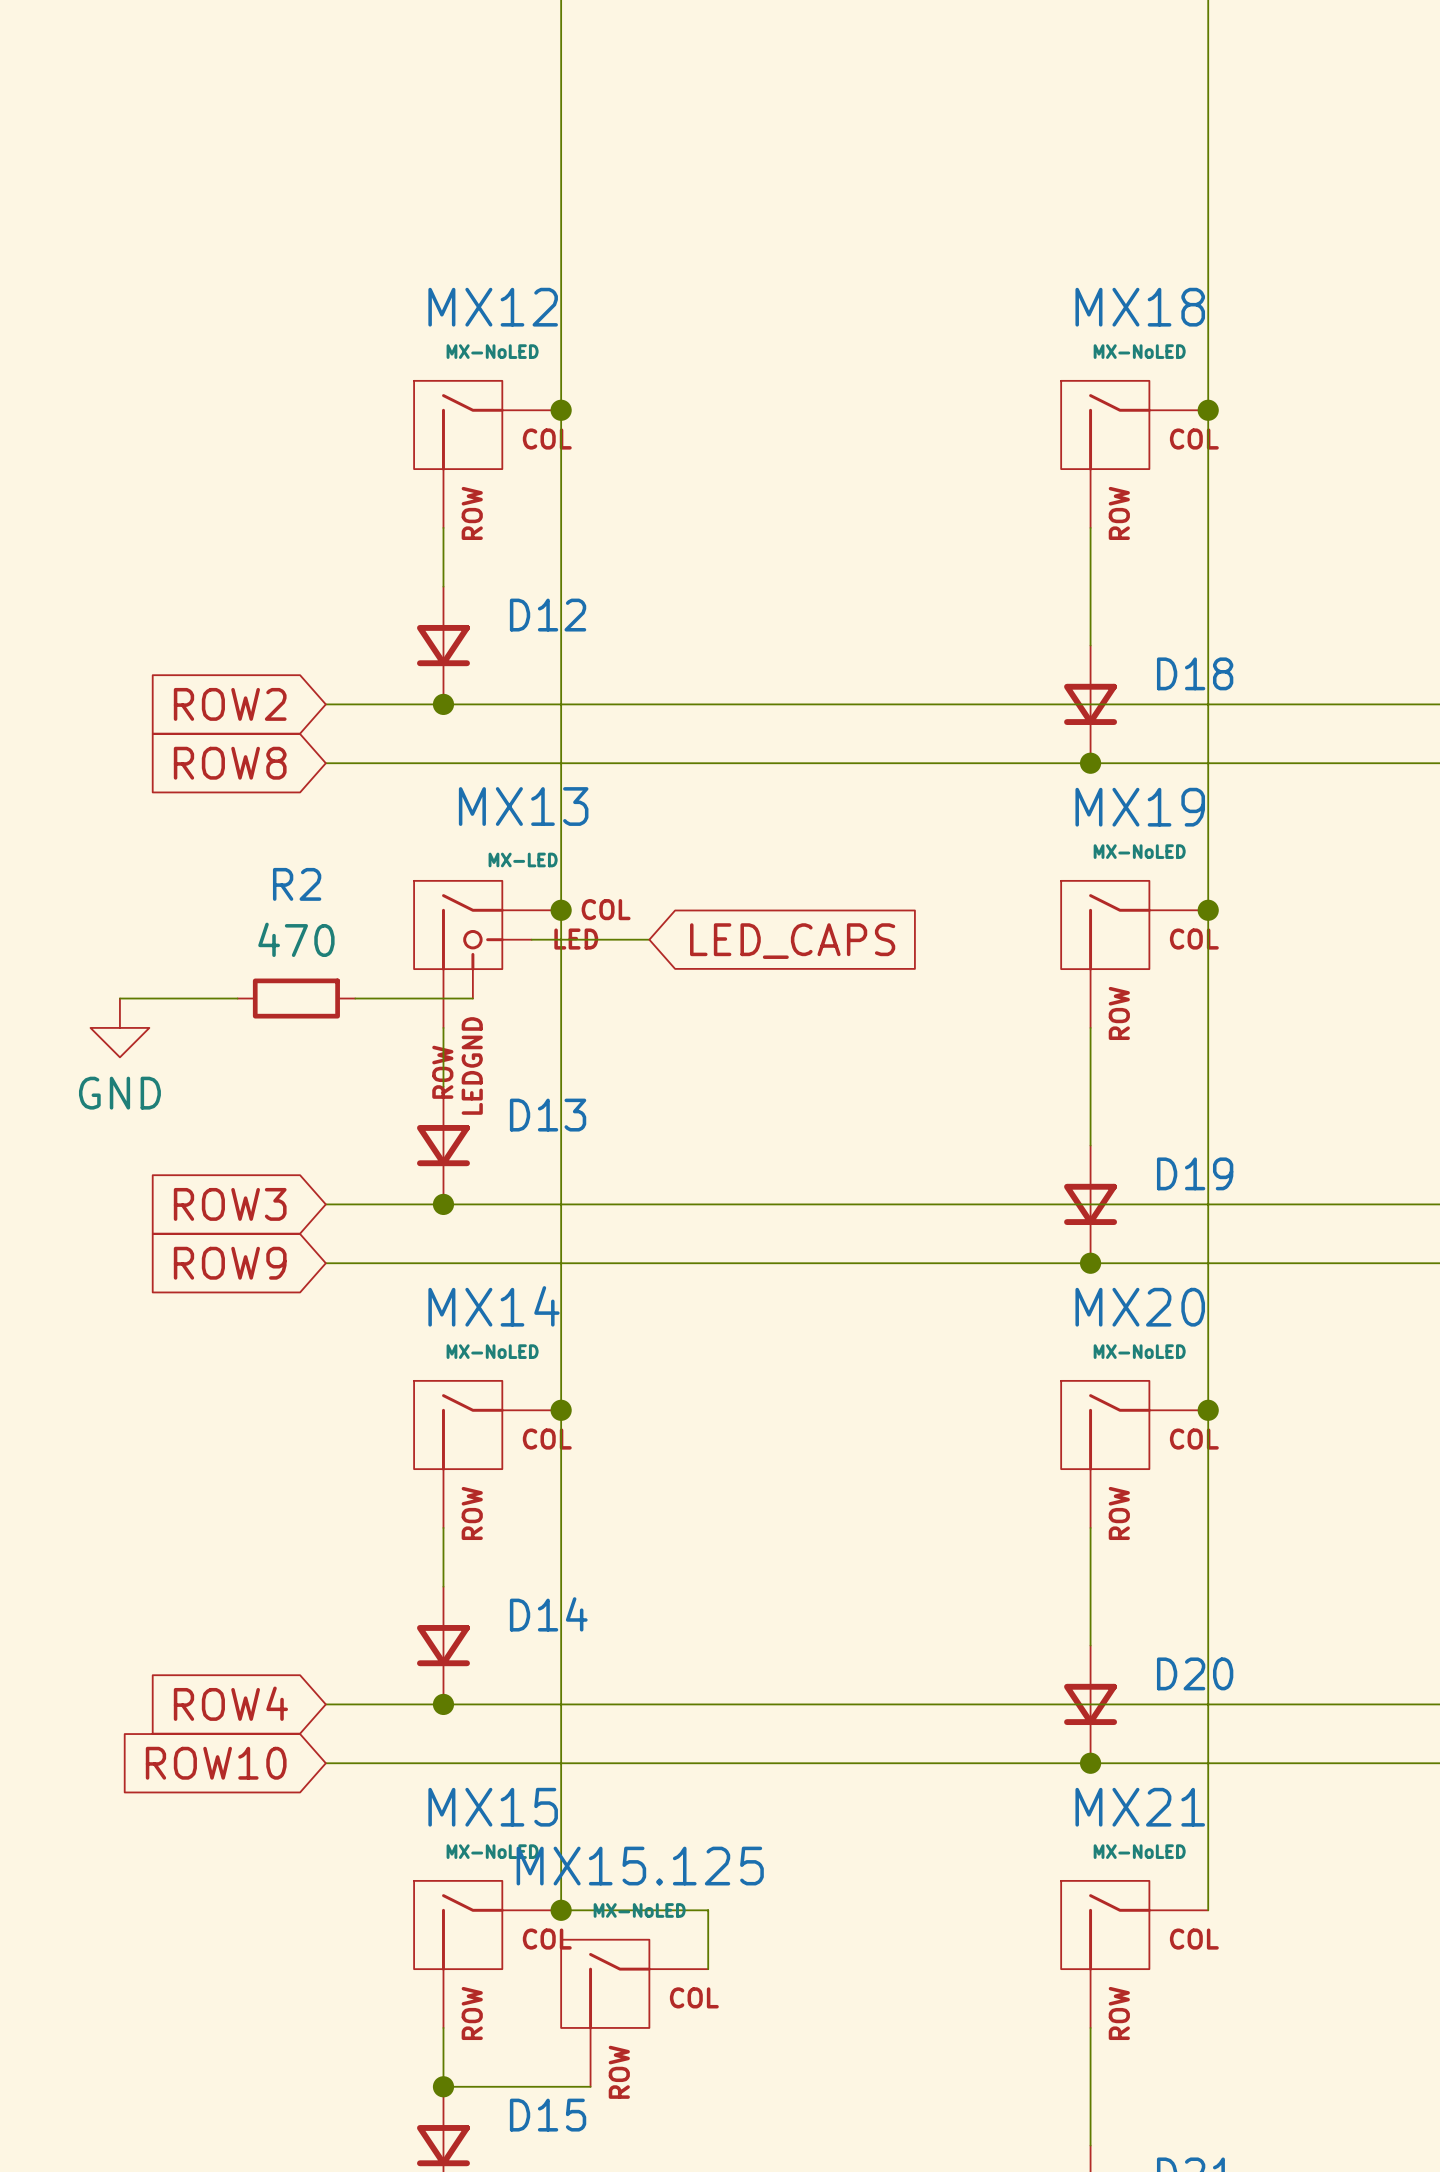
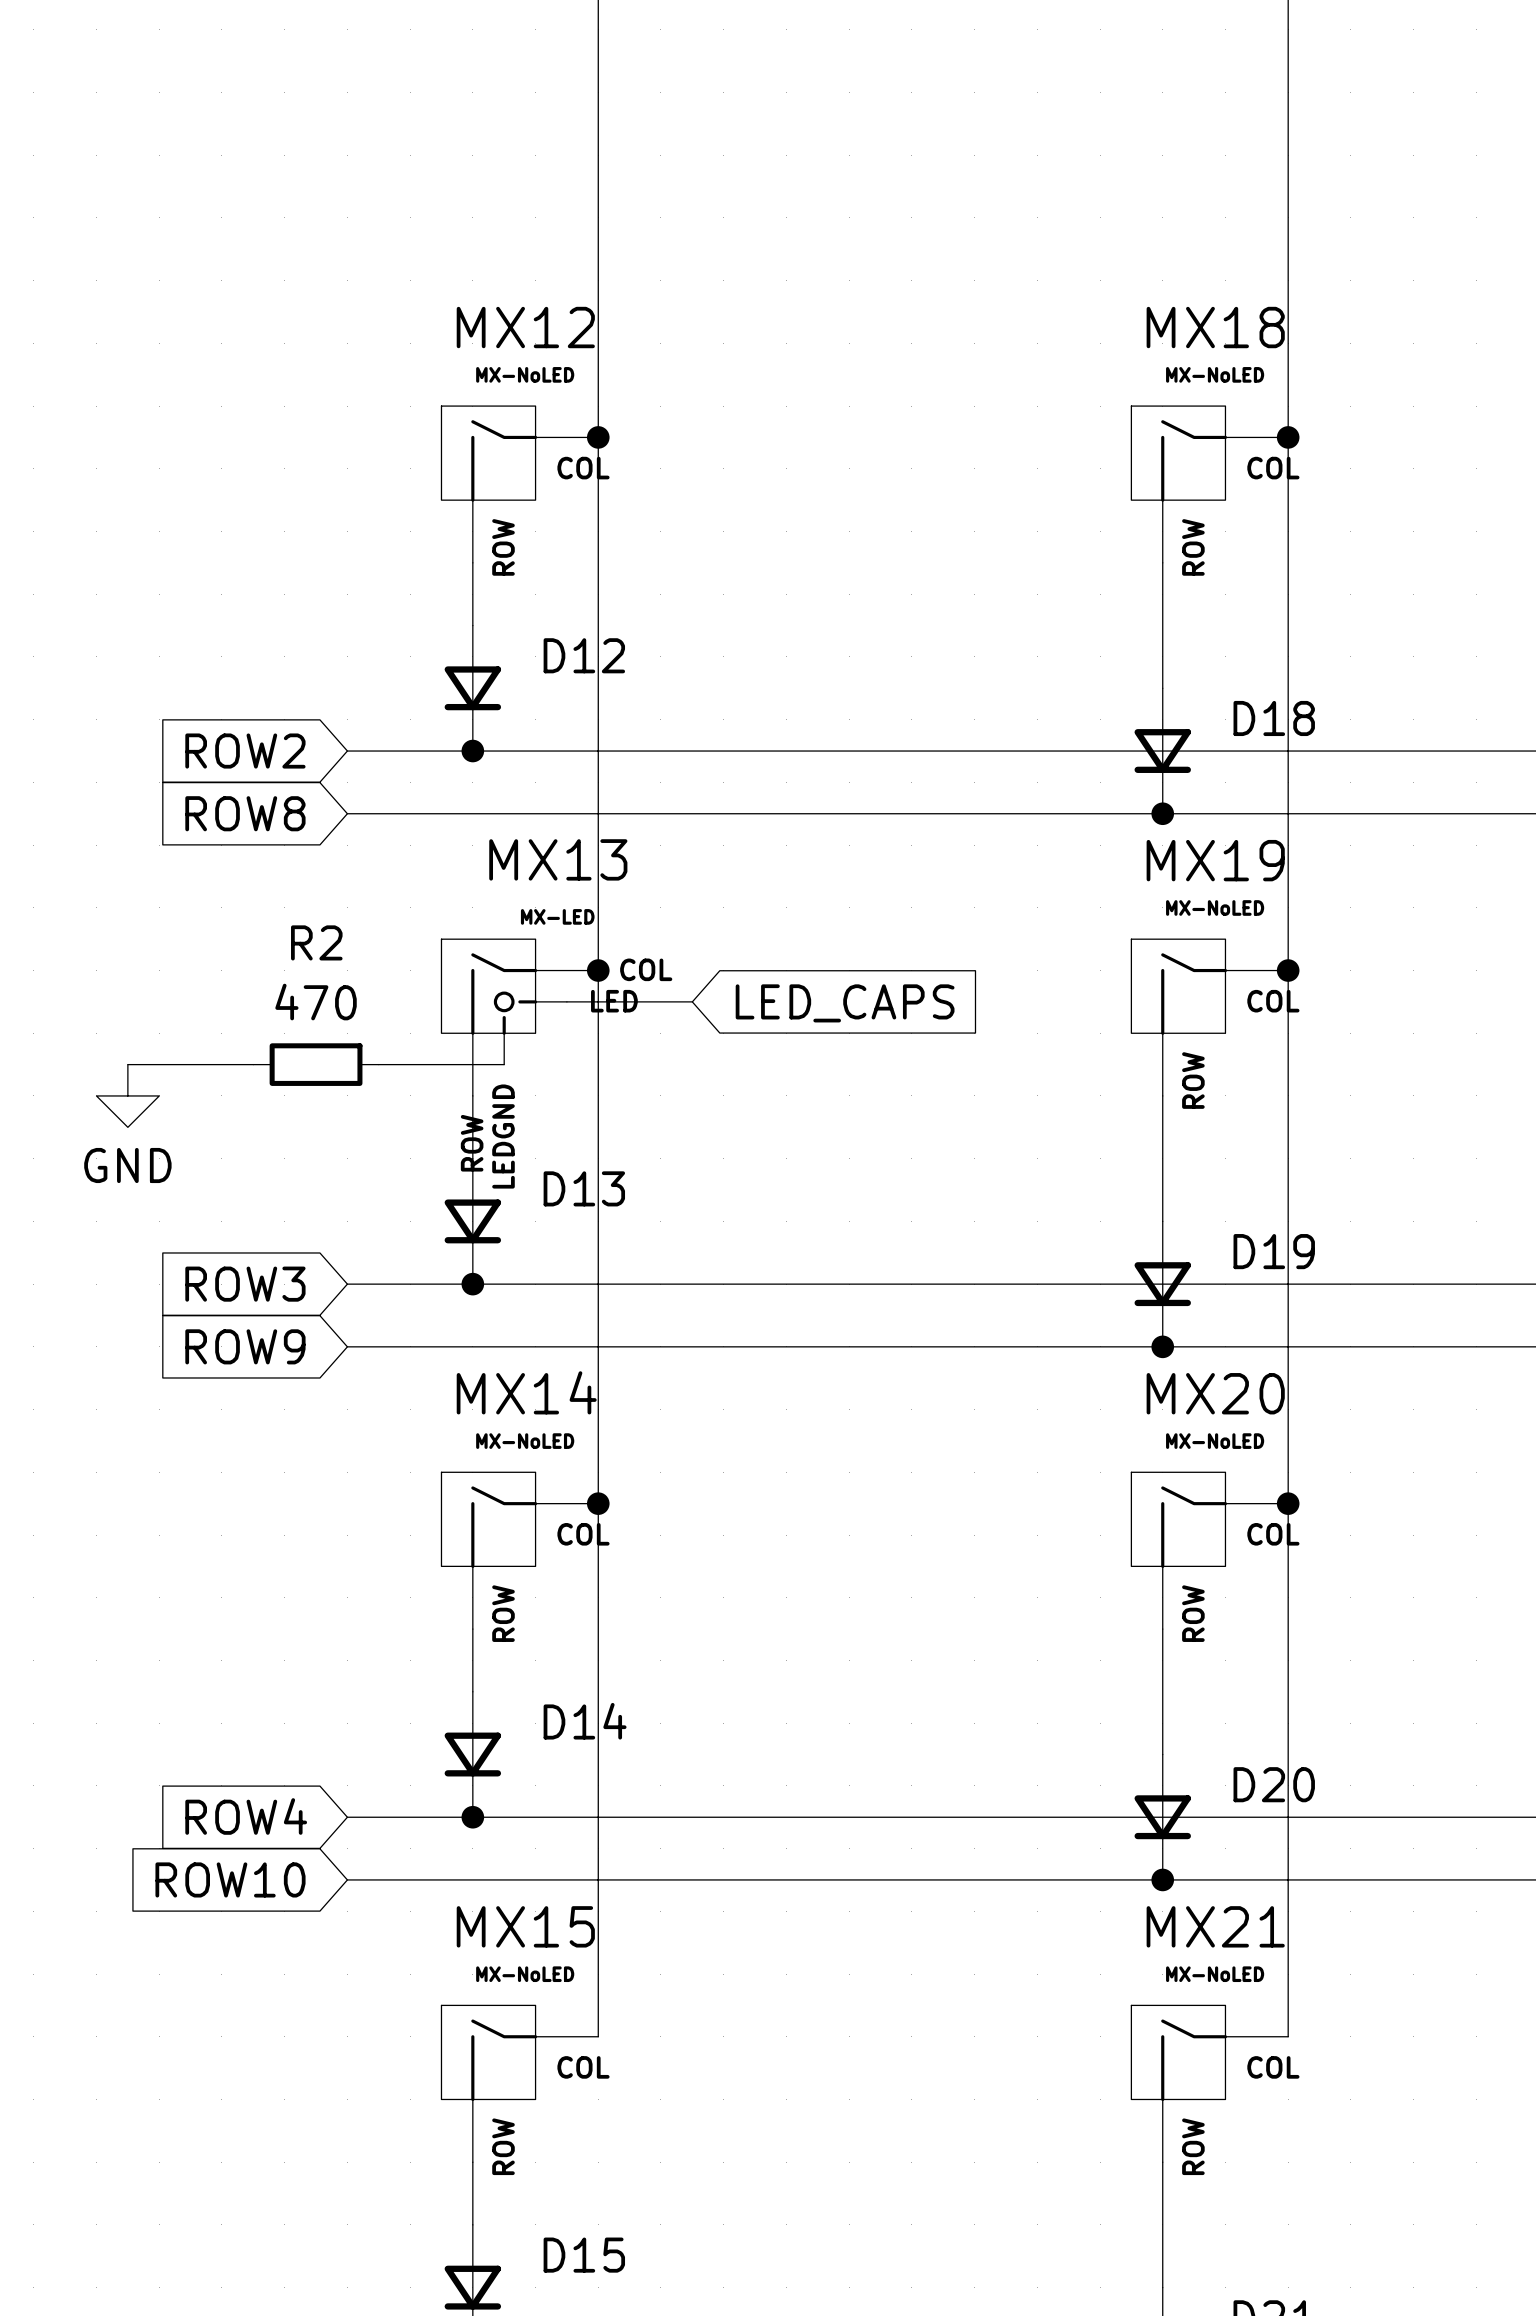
wire: (561, 1910) (708, 1910) (708, 1969) -> none
junction: (561, 1910) -> none
MX15.125: MX-NoLED (634, 2013) -> none
wire: (443, 2086) (590, 2086) -> none
junction: (443, 2086) -> none

